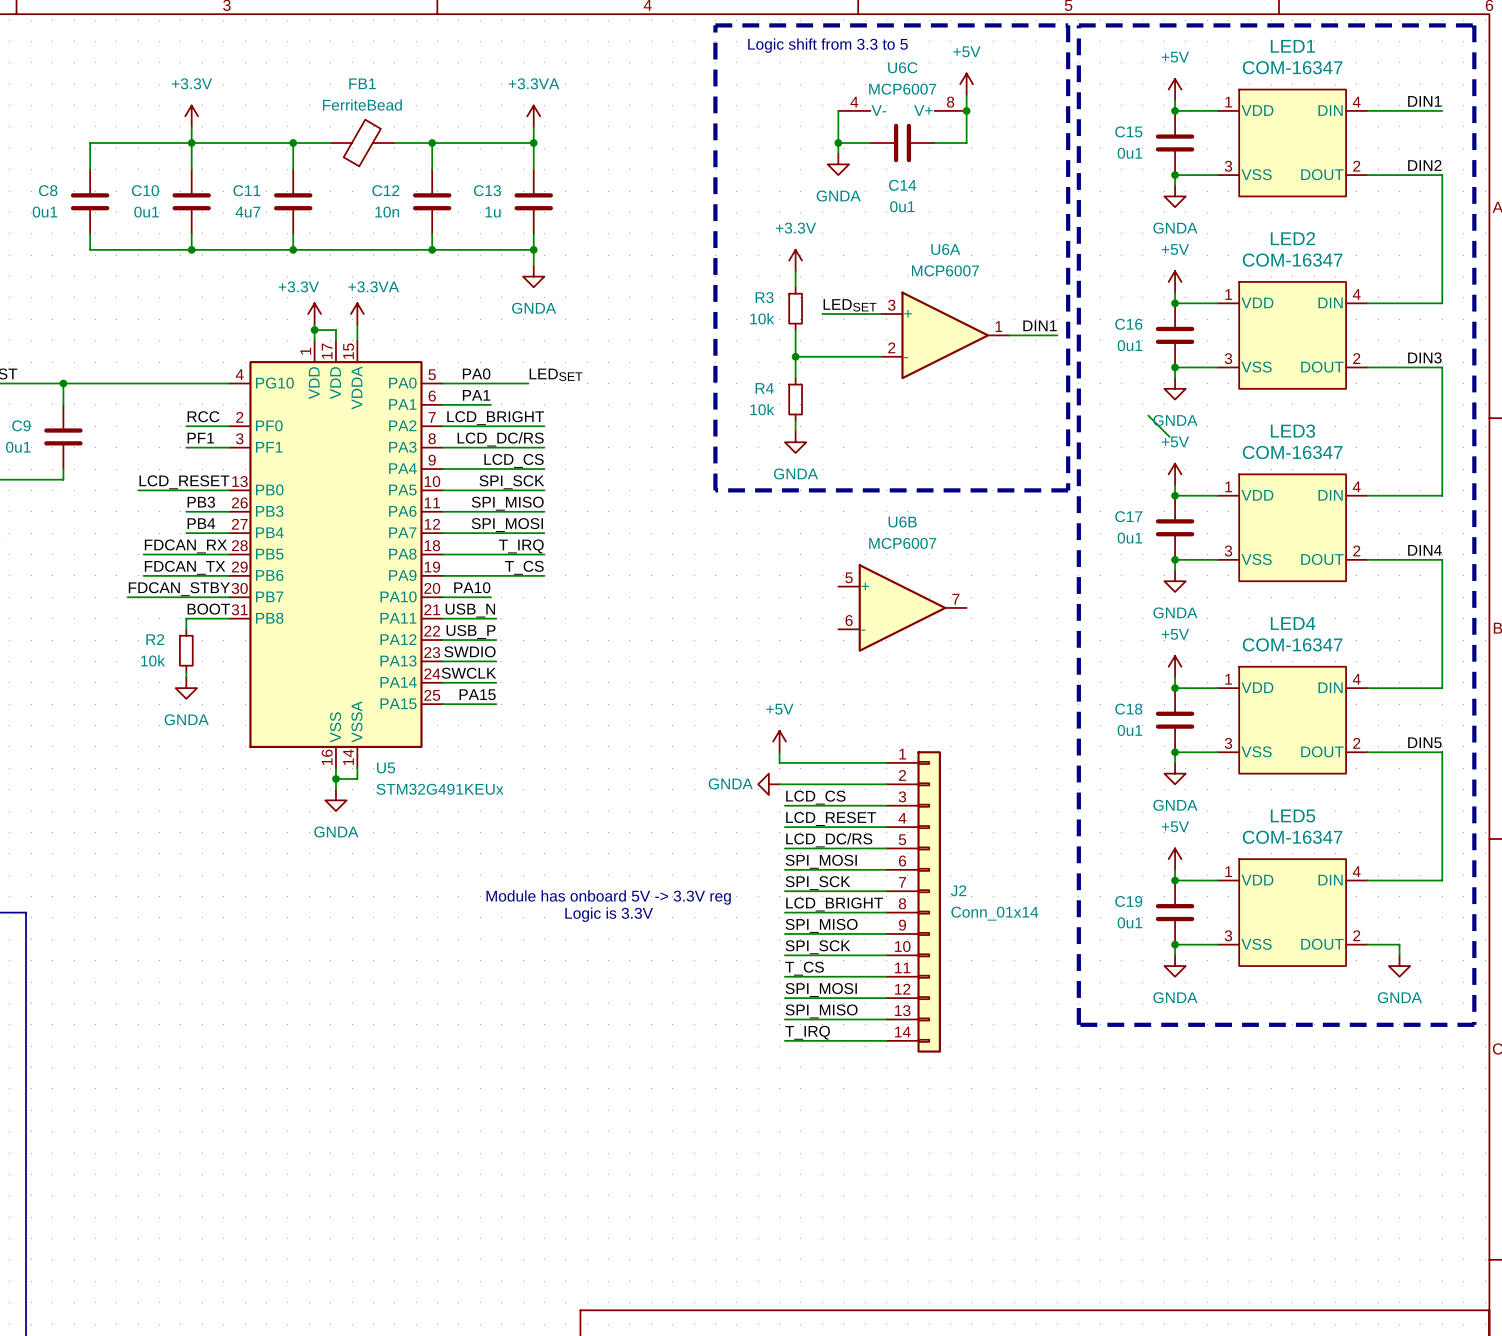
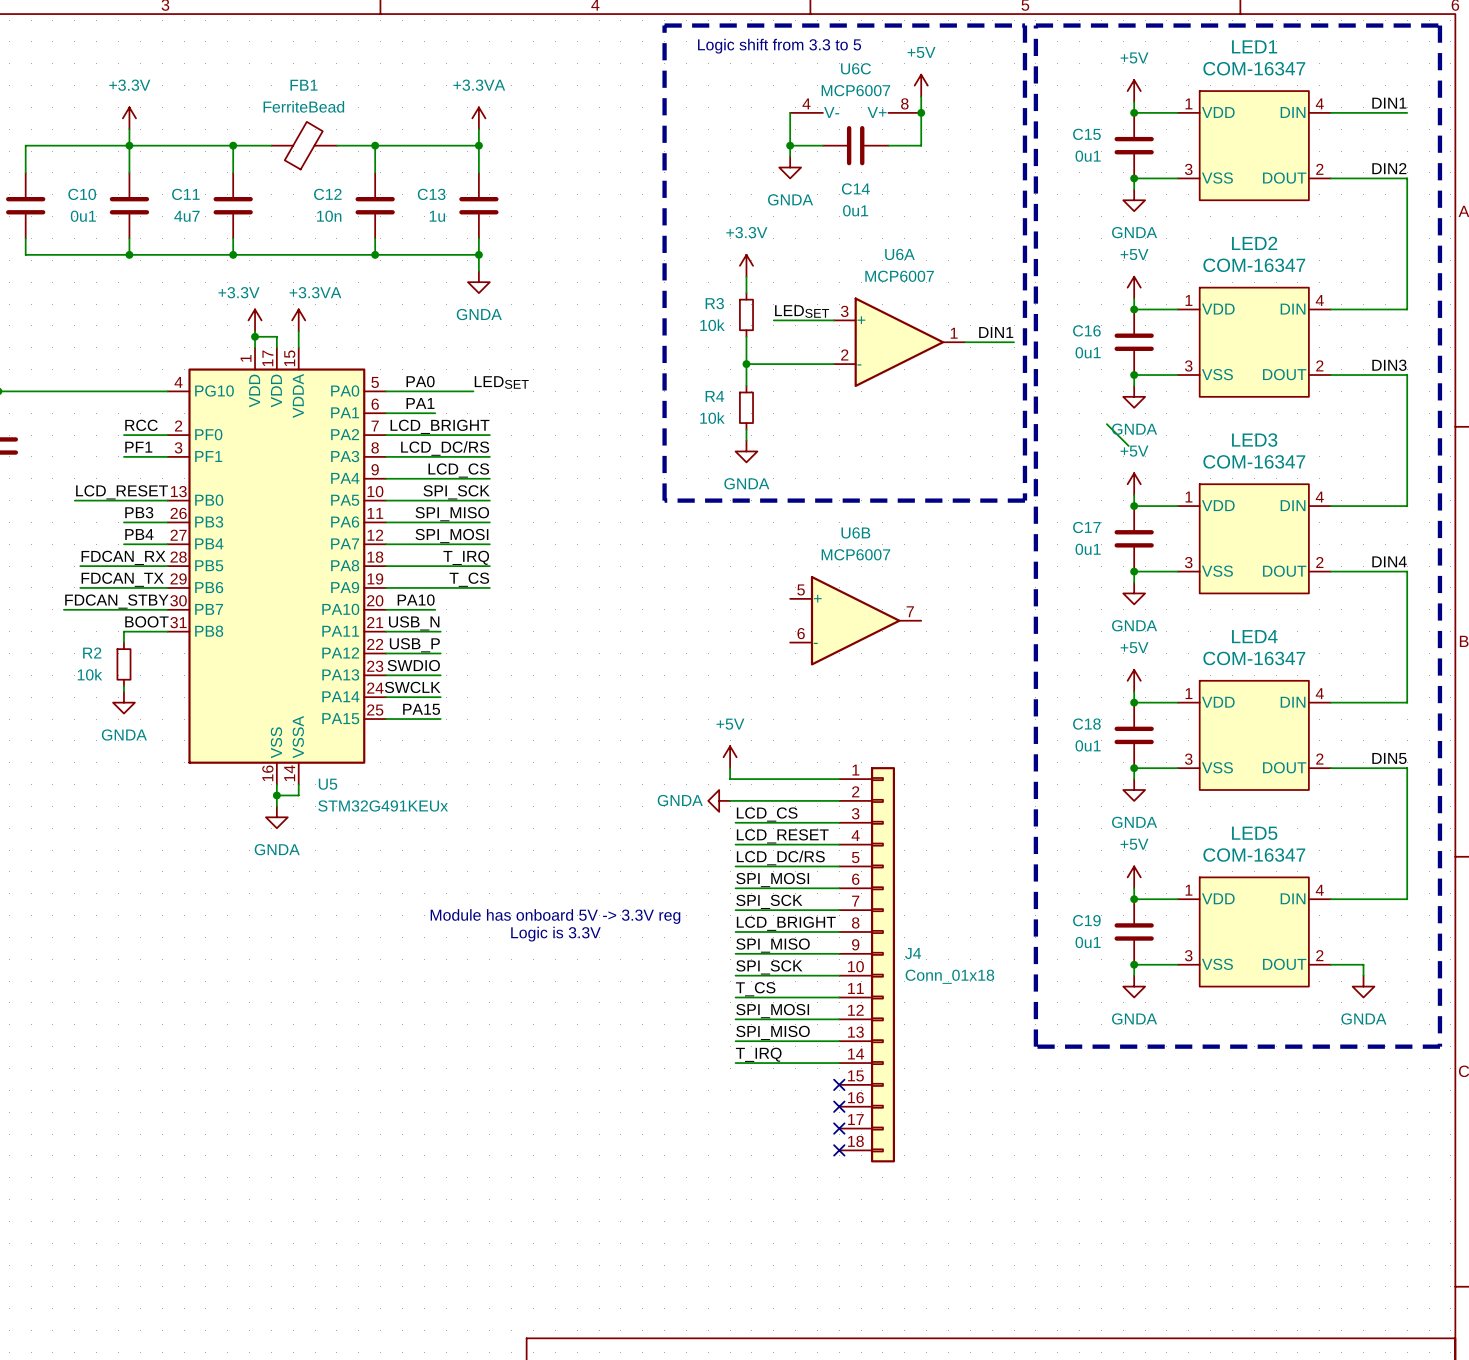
J2: Conn_01x14 (913, 901) -> none
J4: none -> Conn_01x18 (867, 964)
no-connect mark: none -> (839, 1084)
no-connect mark: none -> (839, 1106)
no-connect mark: none -> (839, 1128)
no-connect mark: none -> (839, 1150)

